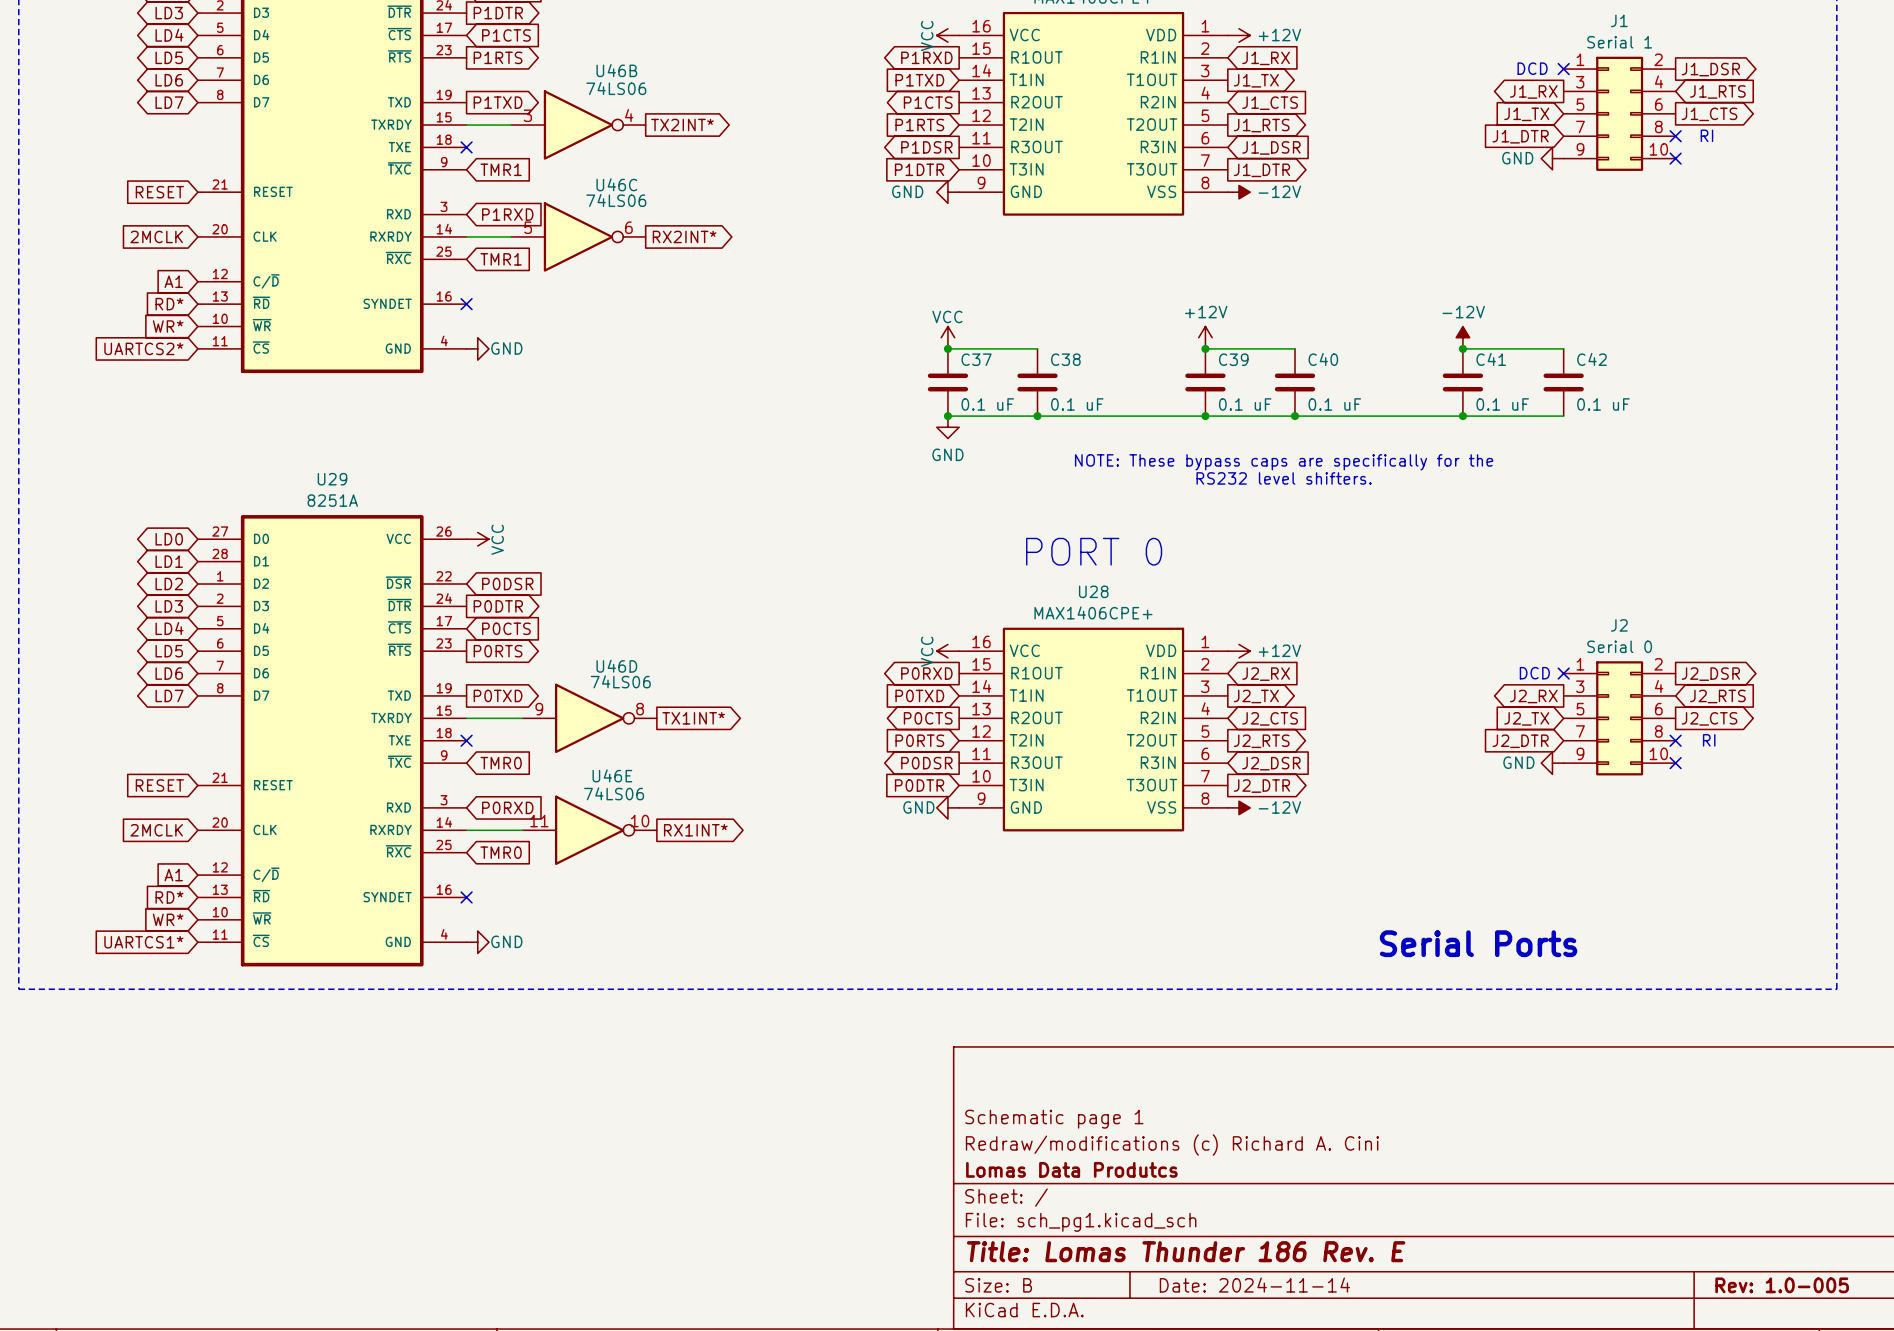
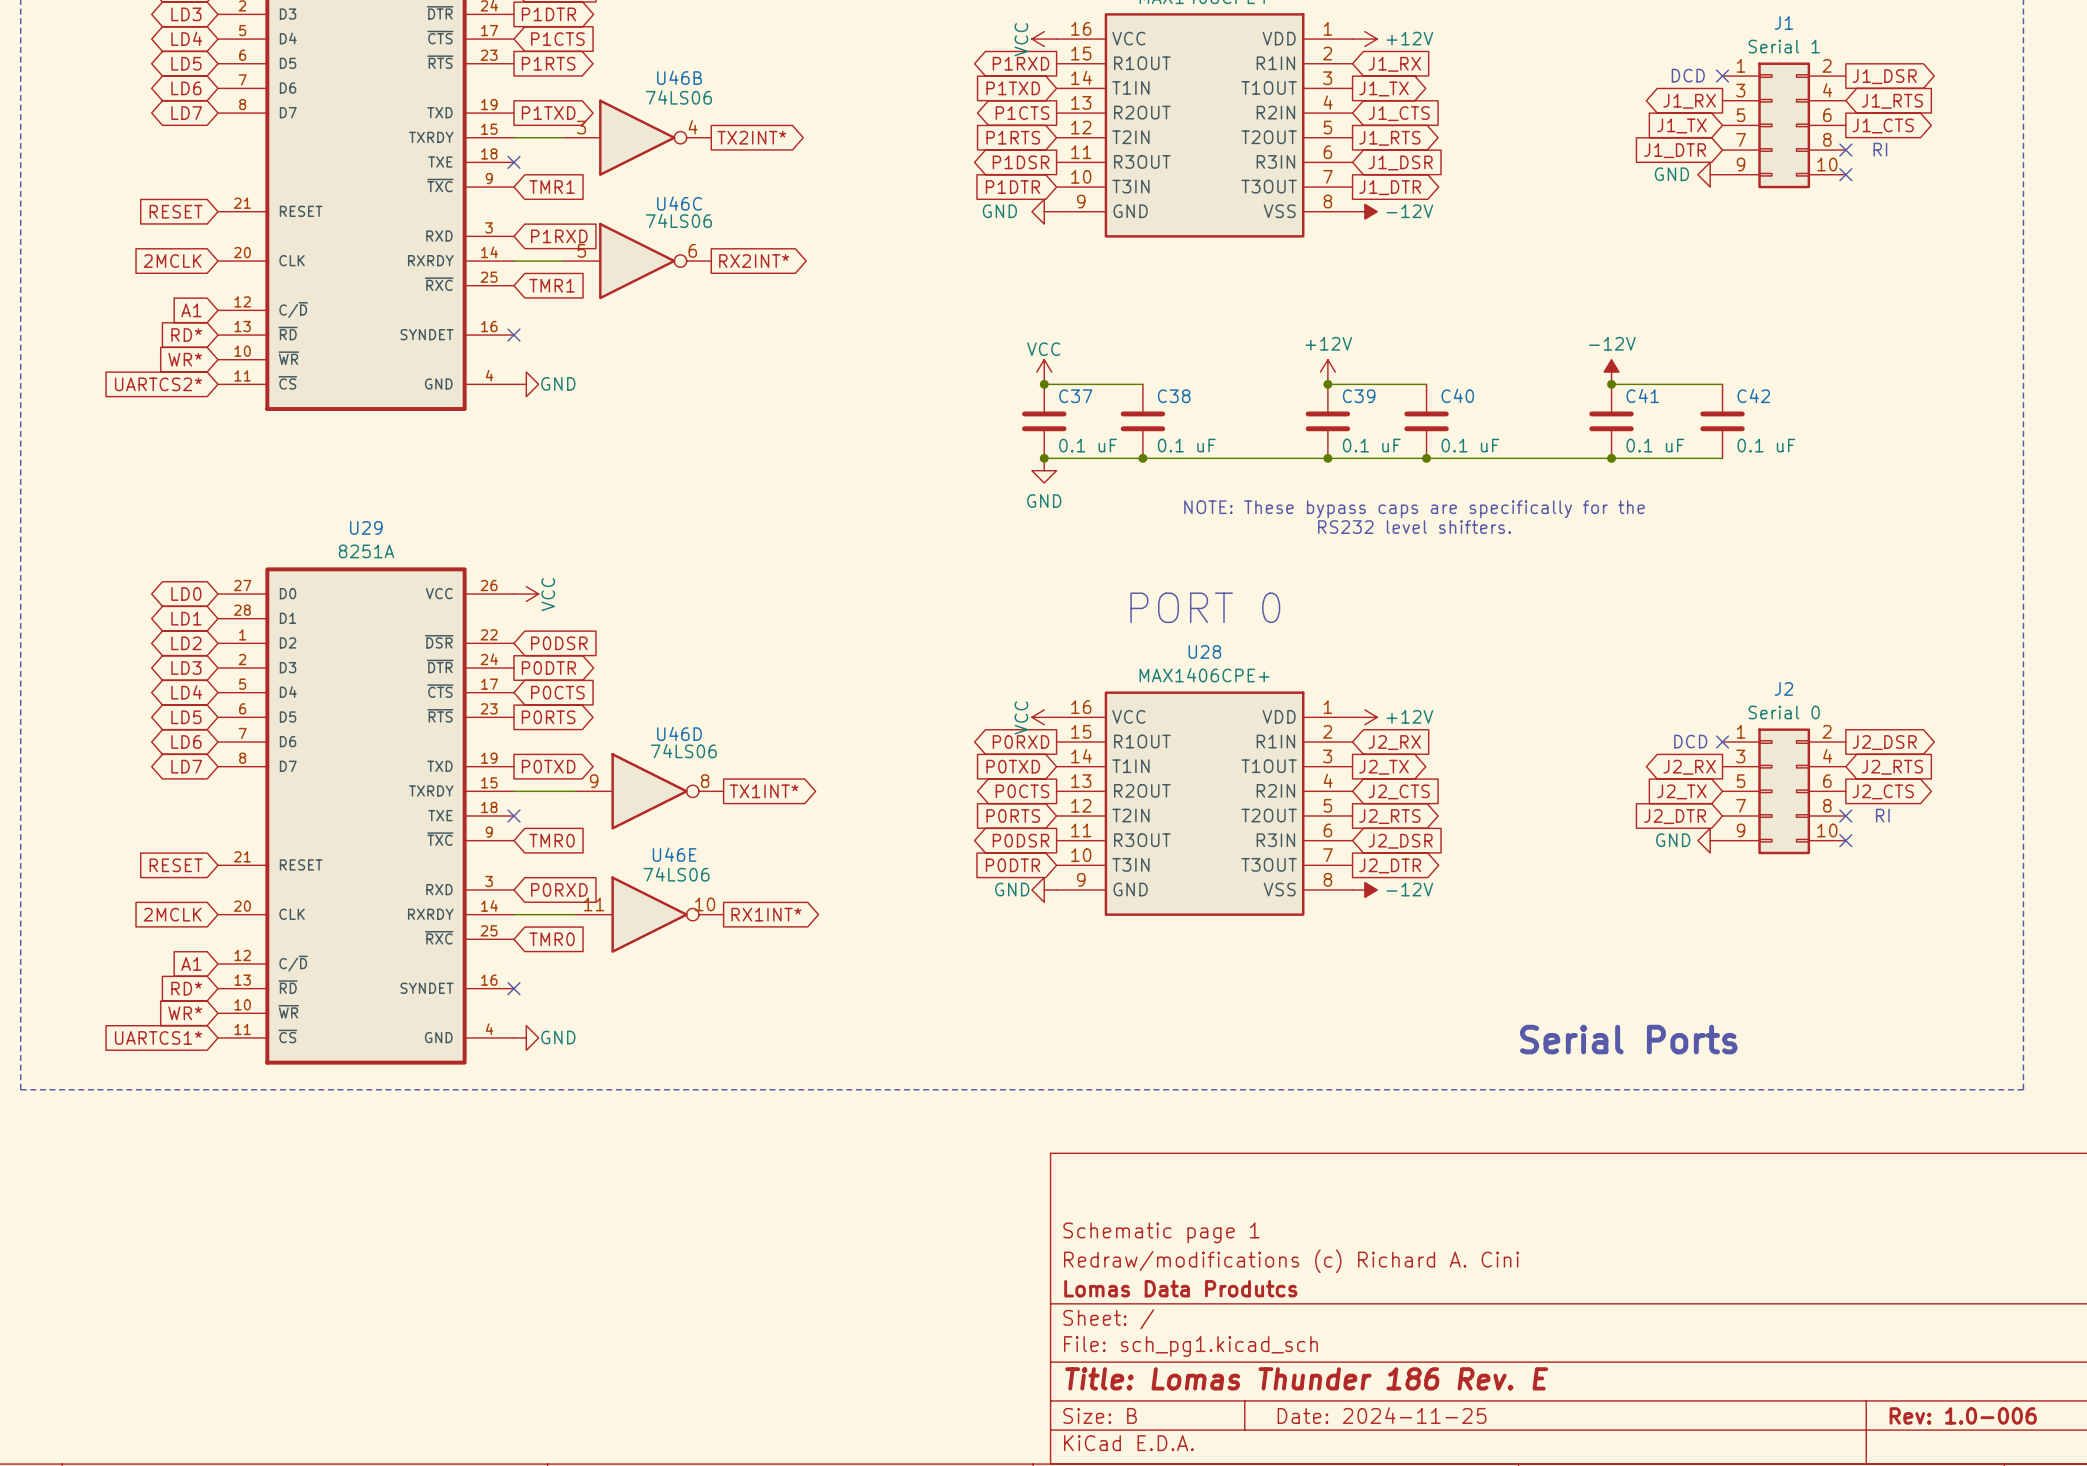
title block: Date: 2024-11-14 (1254, 1285) -> Date: 2024-11-25 (1382, 1415)
title block: Rev: 1.0-005 (1782, 1285) -> Rev: 1.0-006 (1963, 1415)

